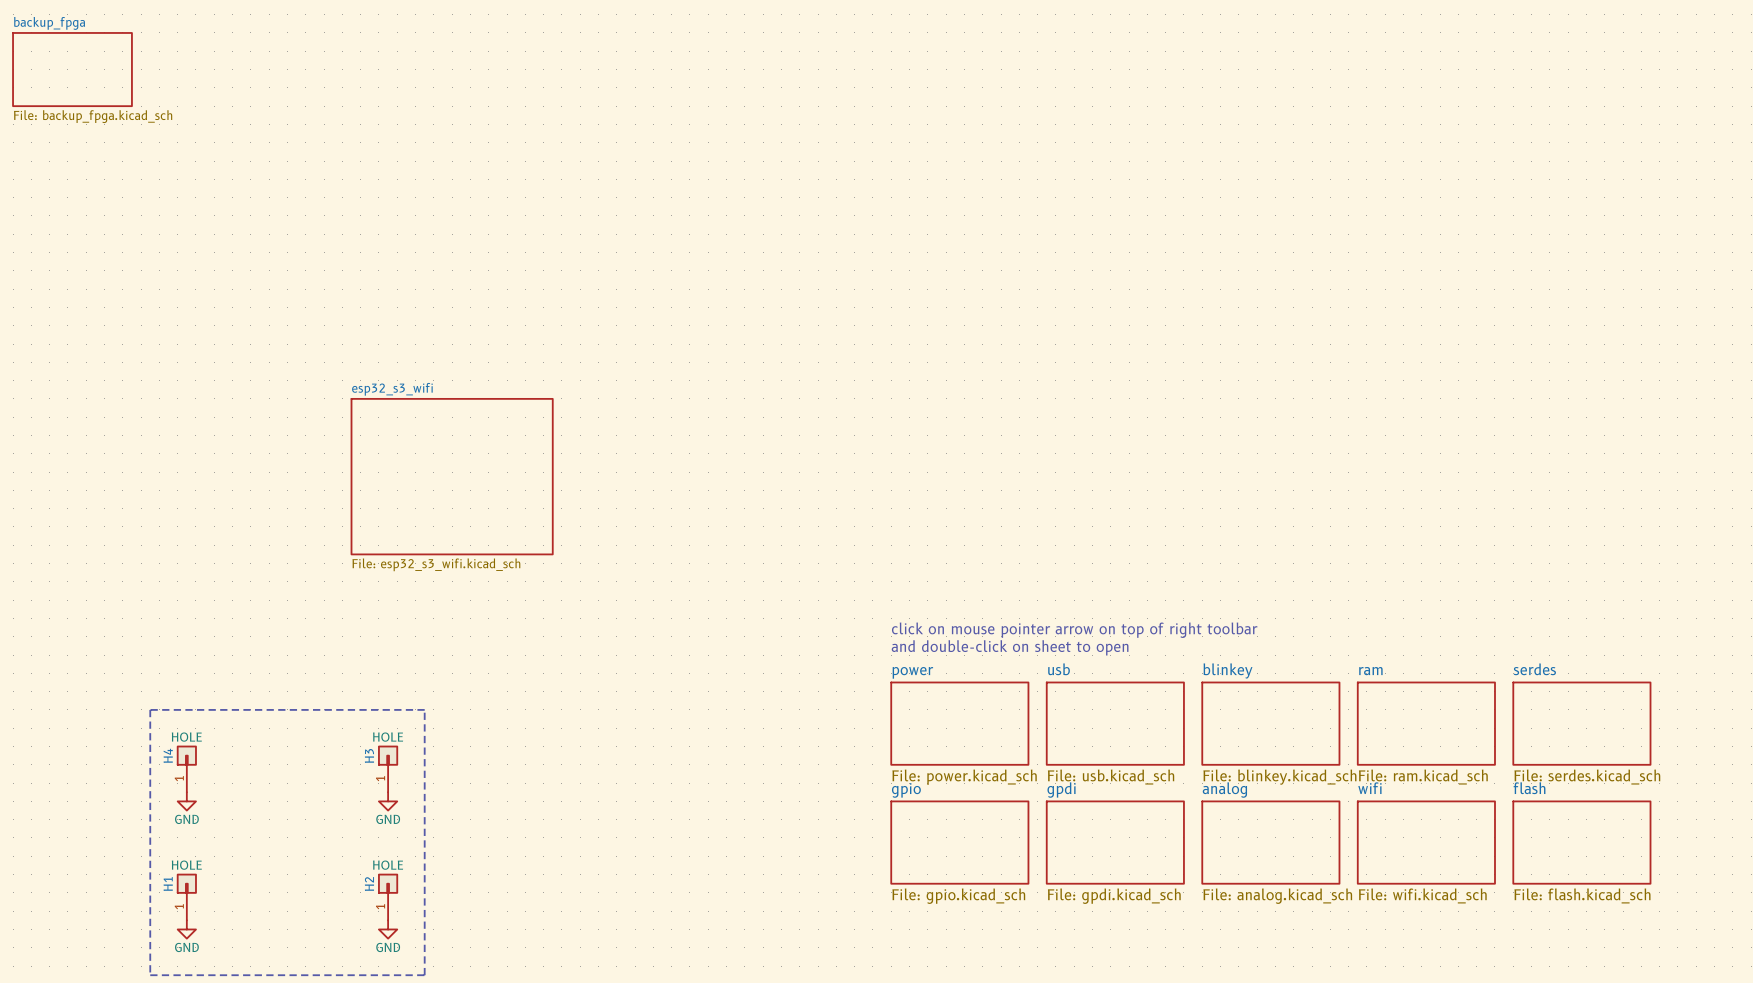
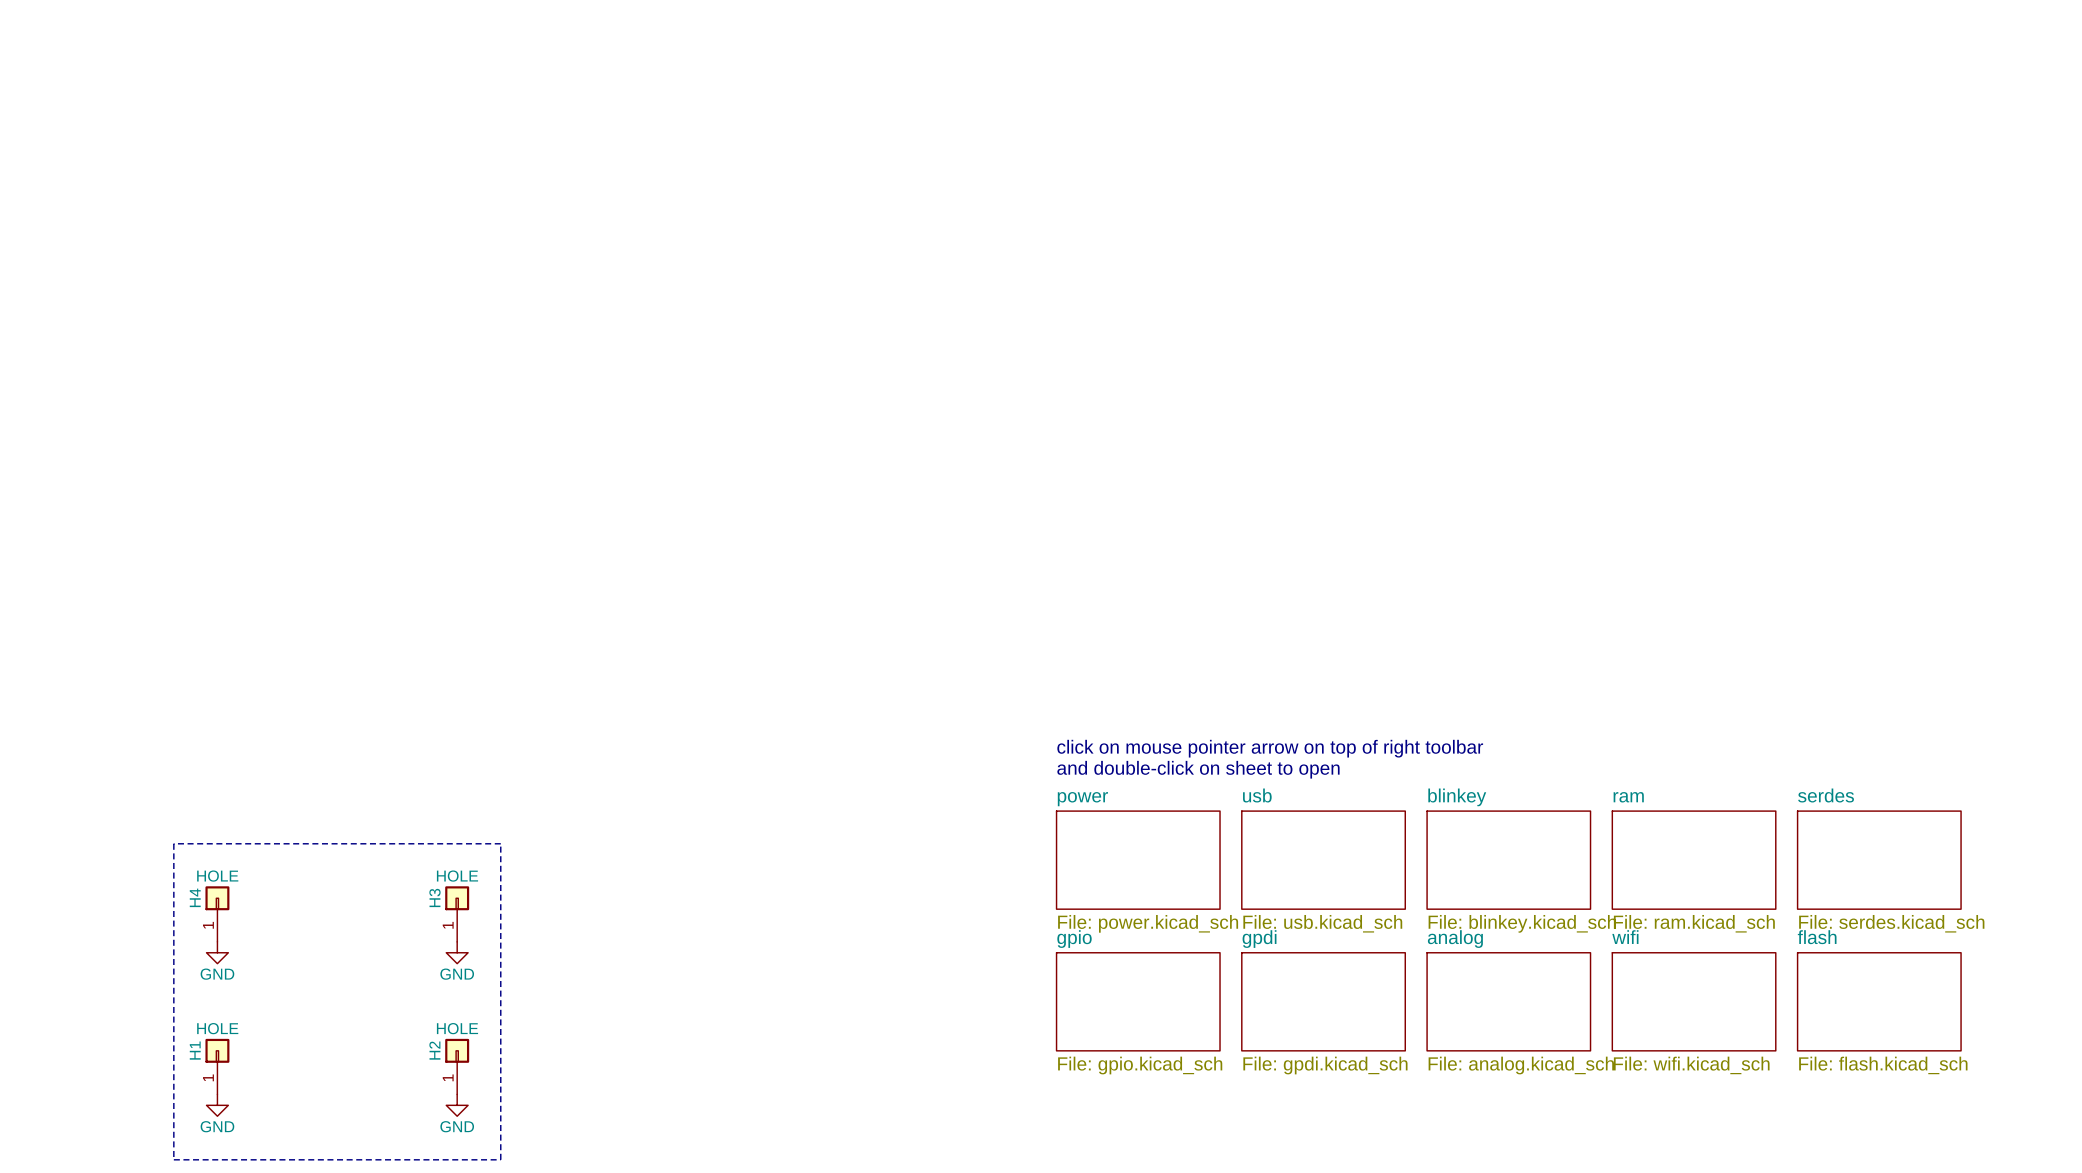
sheet backup_fpga: File: backup_fpga.kicad_sch (72, 69) -> none
sheet esp32_s3_wifi: File: esp32_s3_wifi.kicad_sch (452, 476) -> none

